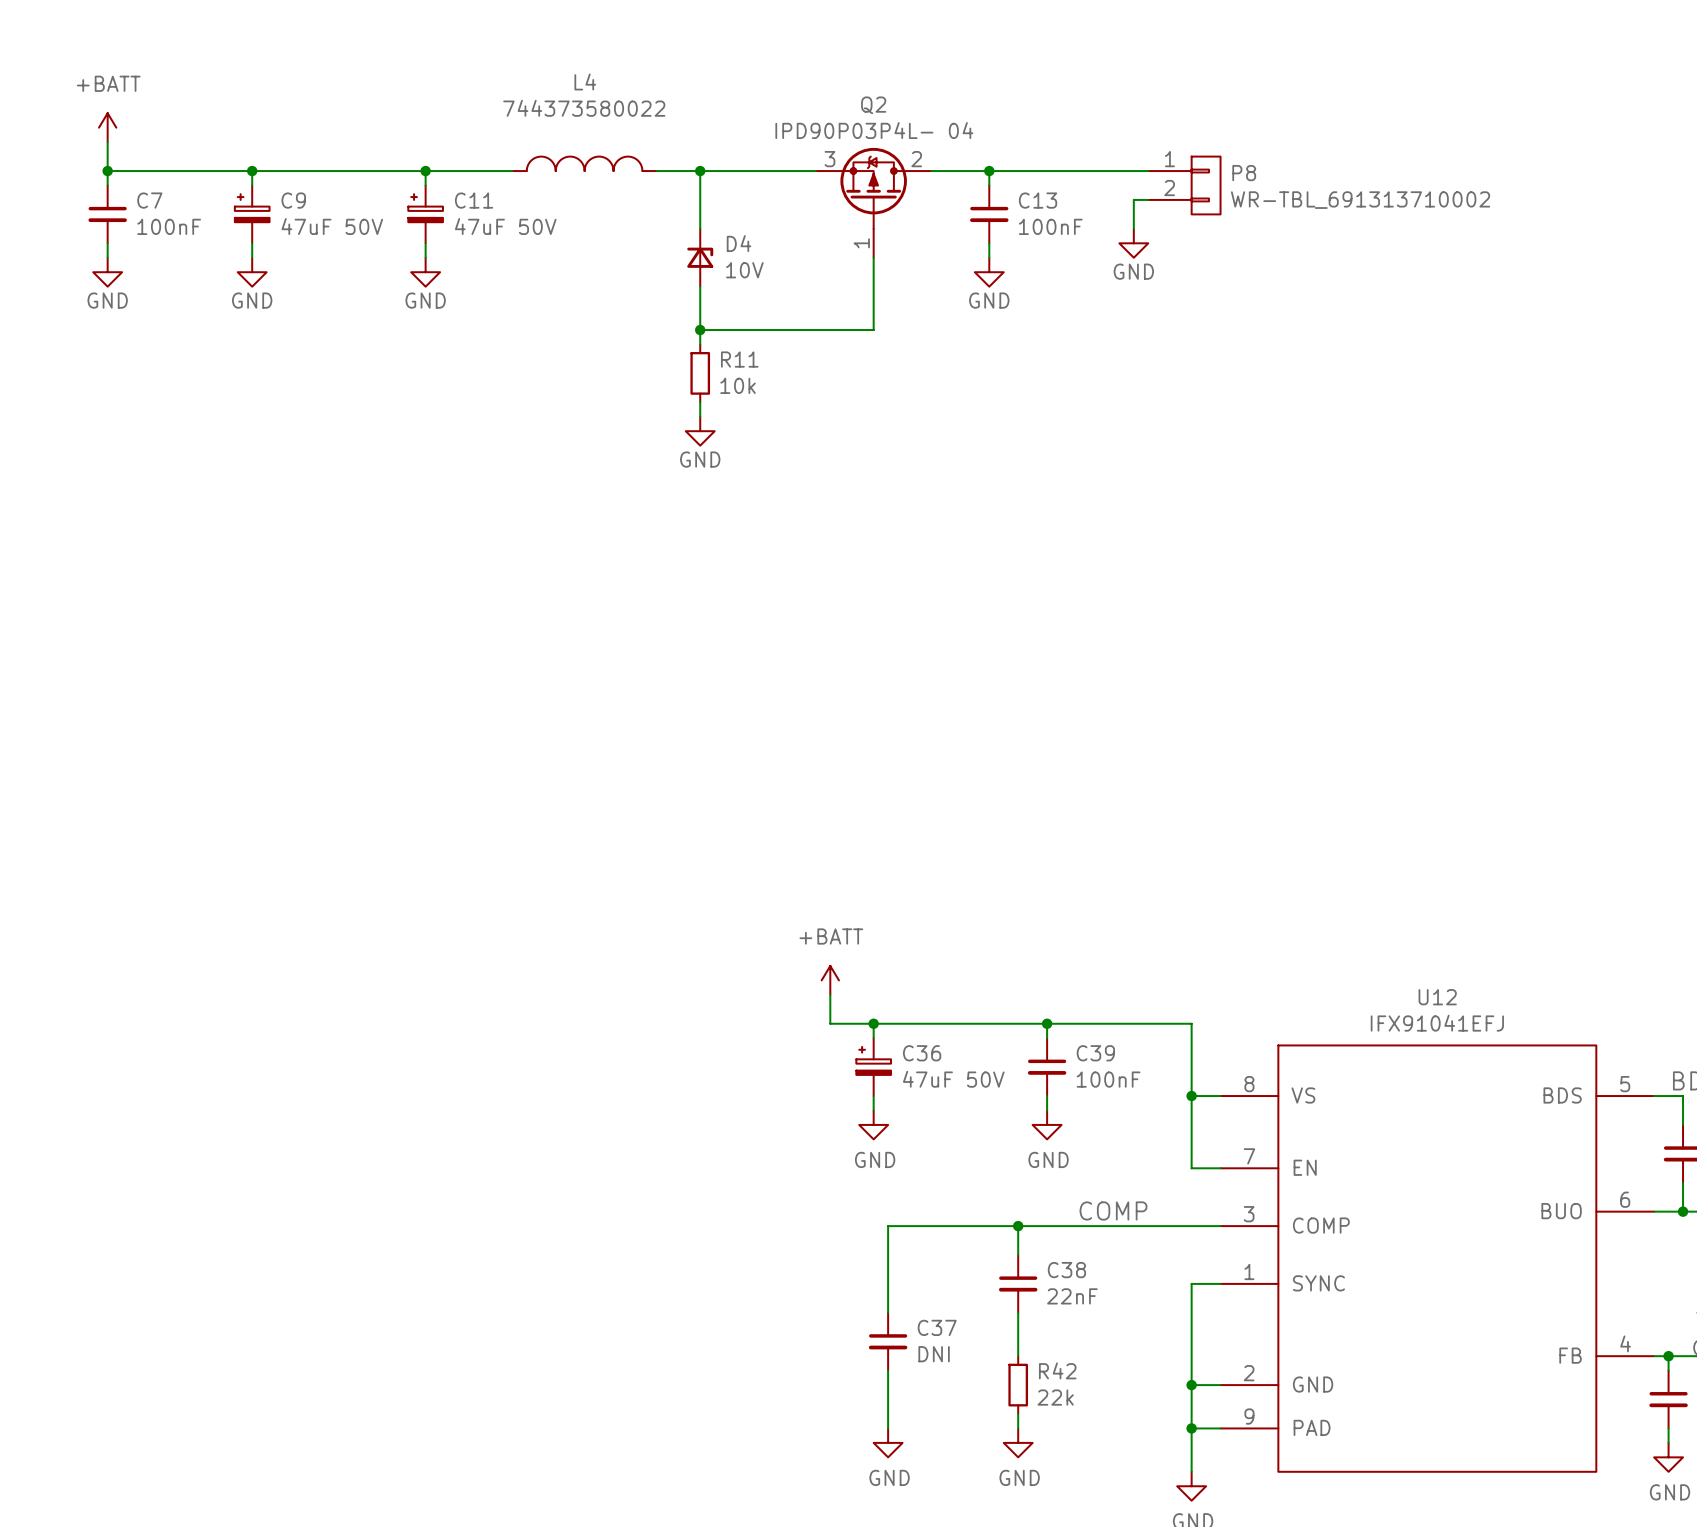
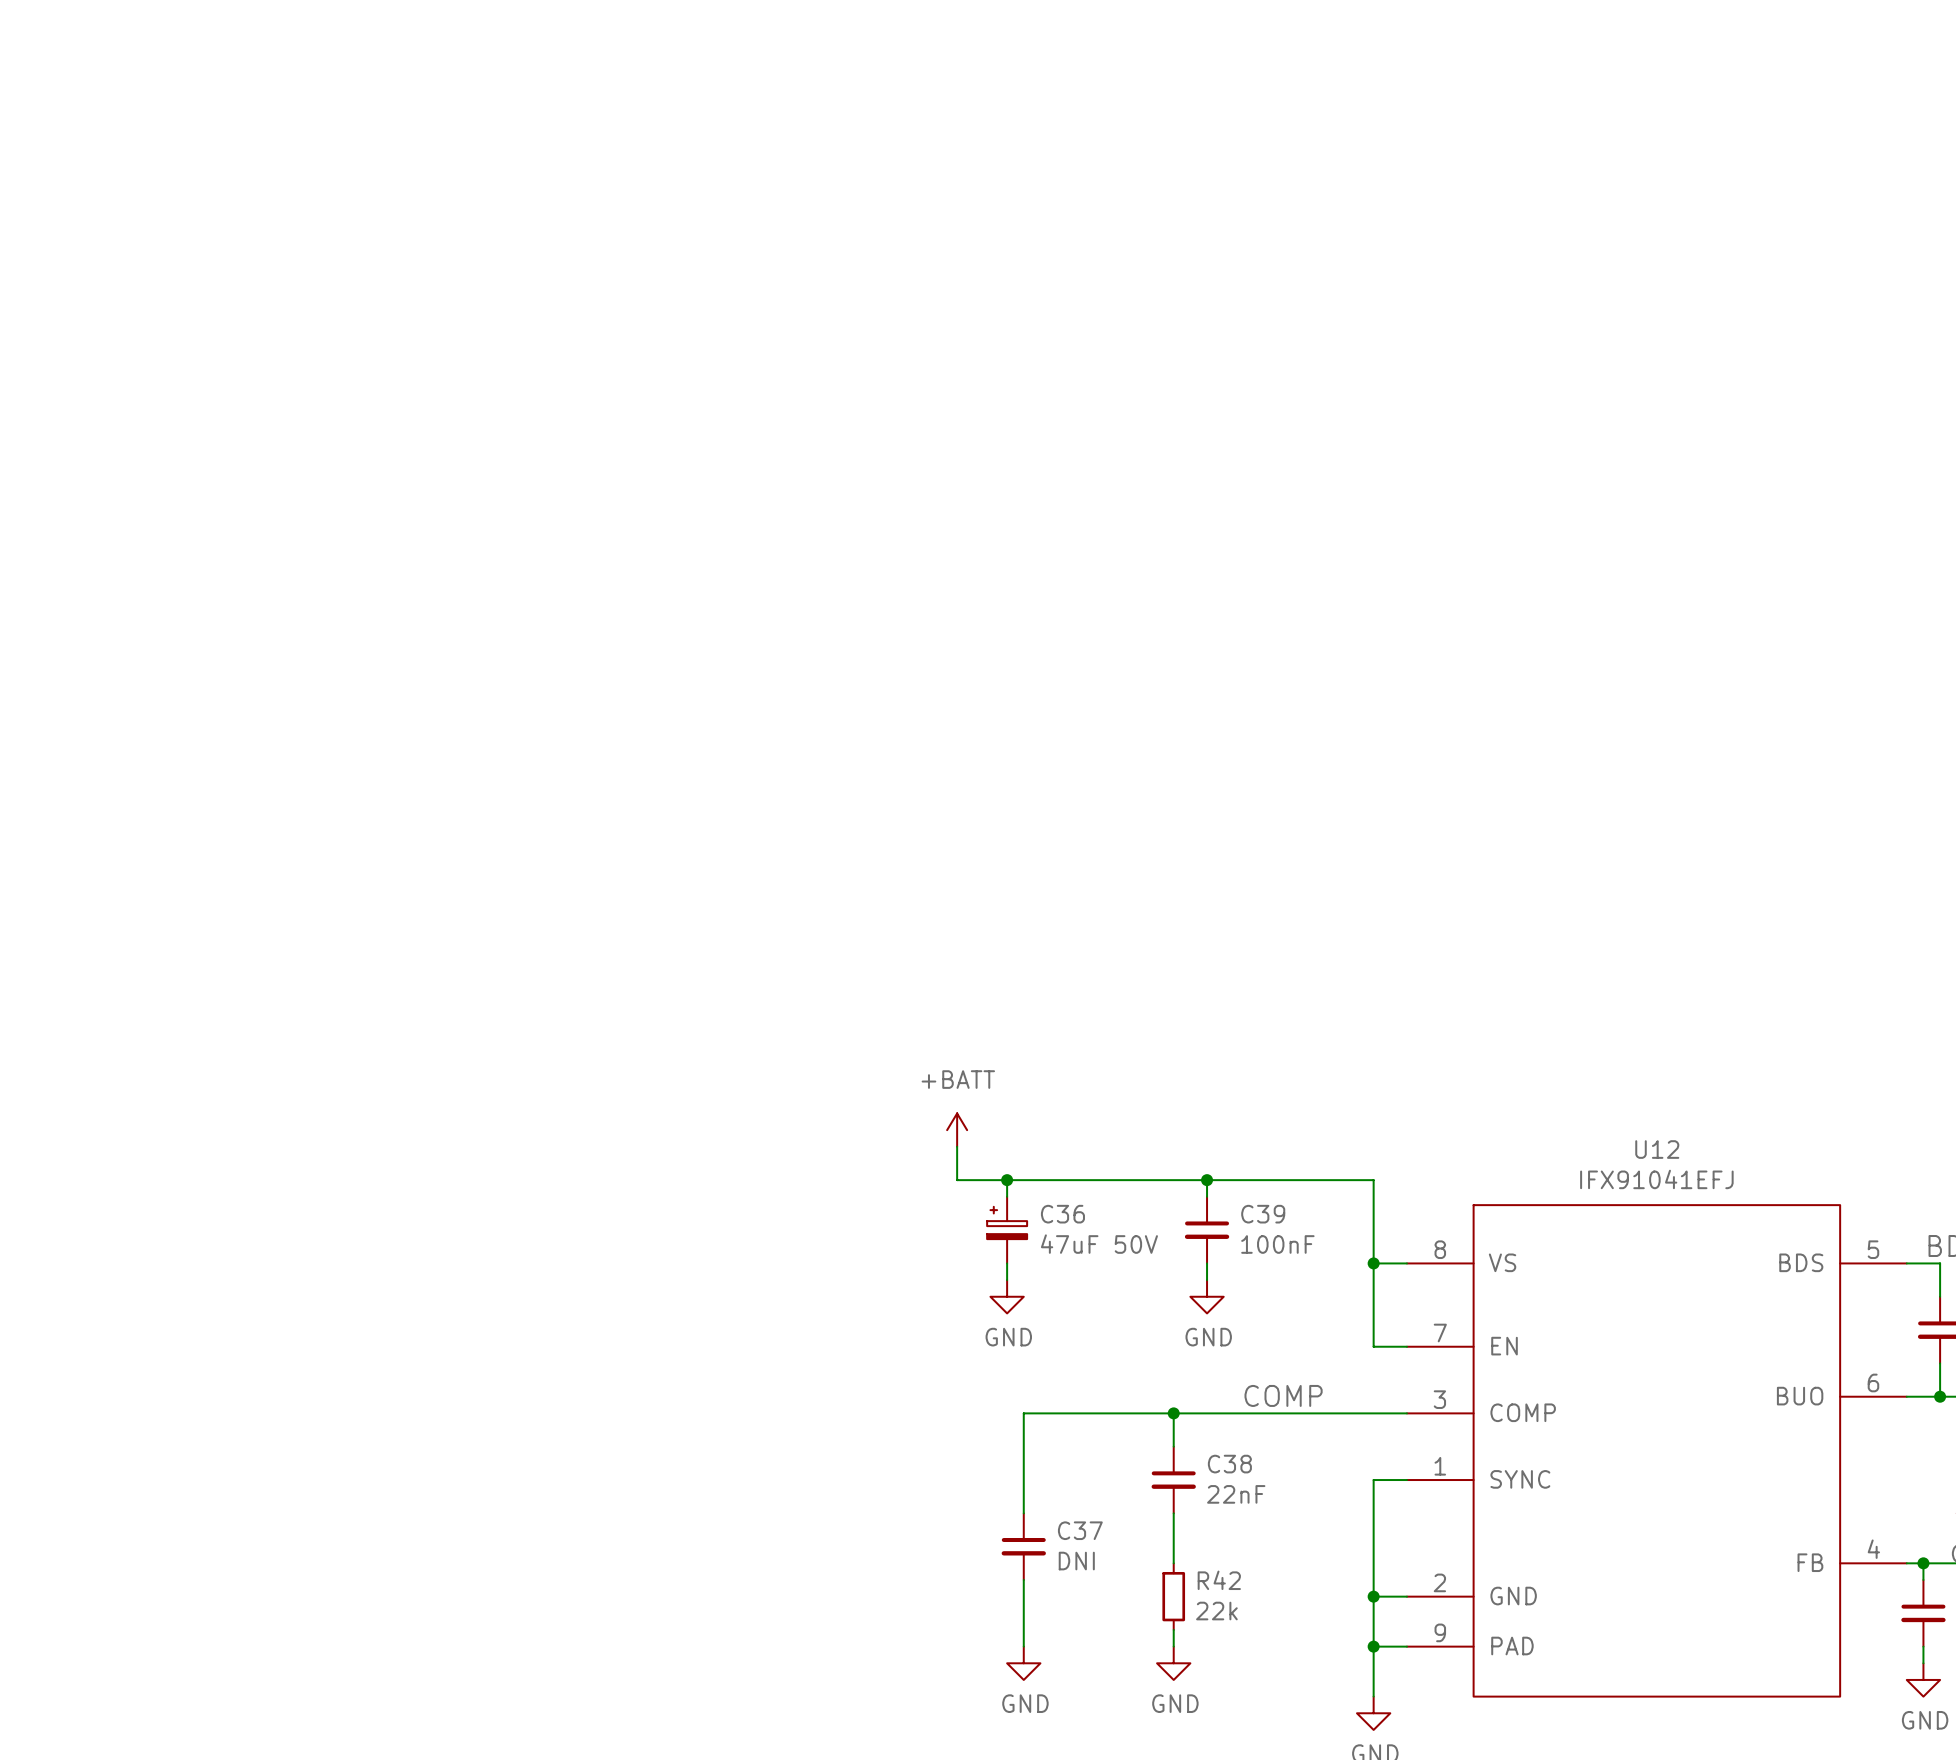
power symbol: +BATT (107, 127) -> none
wire: (107, 142) (107, 185) -> none
L4: 744373580022 (584, 163) -> none
wire: (107, 171) (512, 171) -> none
junction: (107, 171) -> none
wire: (252, 171) (252, 185) -> none
junction: (252, 171) -> none
wire: (425, 171) (425, 185) -> none
junction: (425, 171) -> none
wire: (656, 171) (815, 171) -> none
wire: (700, 171) (700, 228) -> none
junction: (700, 171) -> none
wire: (931, 171) (1148, 171) -> none
wire: (989, 171) (989, 185) -> none
junction: (989, 171) -> none
P8: WR-TBL_691313710002 (1184, 185) -> none
wire: (1148, 199) (1133, 199) (1133, 228) -> none
Q2: IPD90P03P4L- 04 (873, 202) -> none
C7: 100nF (107, 214) -> none
C9: 47uF 50V (252, 214) -> none
C11: 47uF 50V (425, 214) -> none
C13: 100nF (989, 214) -> none
wire: (107, 243) (107, 257) -> none
wire: (252, 243) (252, 257) -> none
wire: (425, 243) (425, 257) -> none
wire: (989, 243) (989, 257) -> none
power symbol: GND (1133, 243) -> none
D4: 10V (700, 257) -> none
wire: (873, 257) (873, 330) (700, 330) -> none
power symbol: GND (107, 272) -> none
power symbol: GND (252, 272) -> none
power symbol: GND (425, 272) -> none
power symbol: GND (989, 272) -> none
wire: (700, 286) (700, 344) -> none
junction: (700, 330) -> none
R11: 10k (700, 373) -> none
wire: (700, 402) (700, 416) -> none
power symbol: GND (700, 431) -> none

